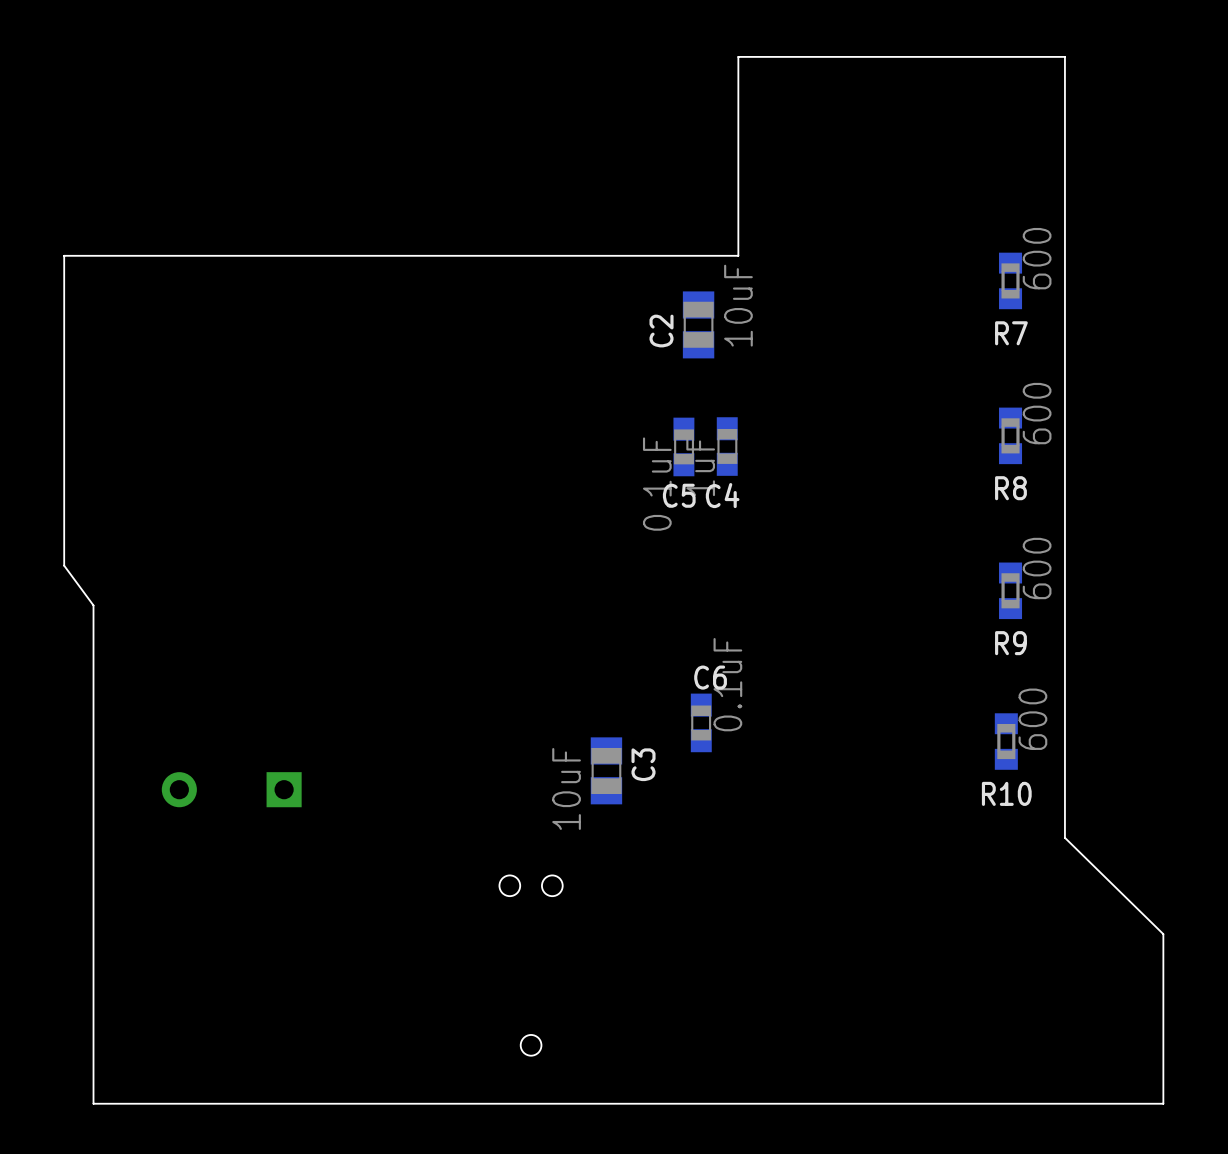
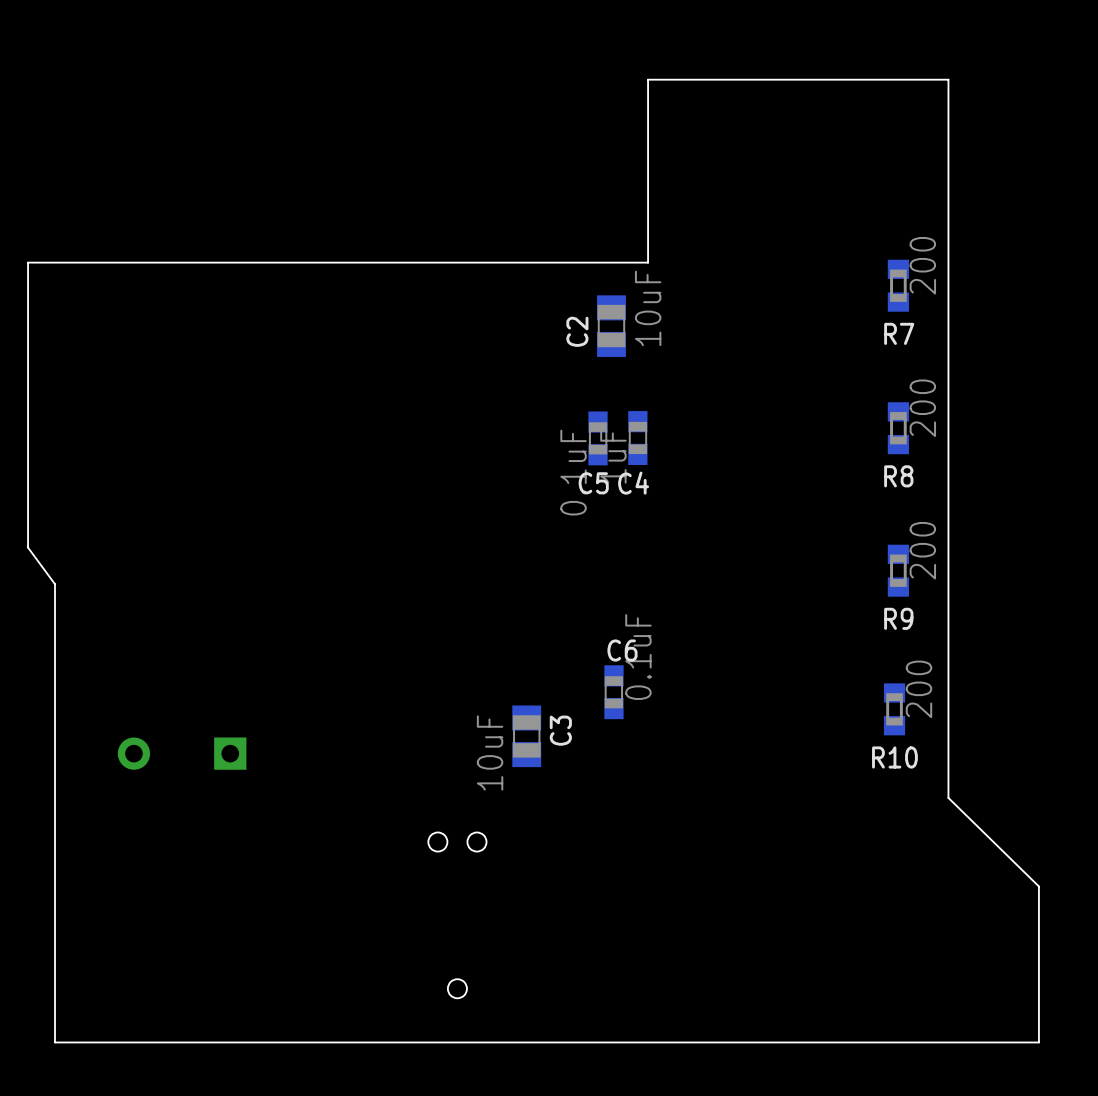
R7 value: 600 (1037, 258) -> 200 (922, 265)
R8 value: 600 (1037, 413) -> 200 (922, 408)
R9 value: 600 (1037, 568) -> 200 (922, 550)
R10 value: 600 (1032, 719) -> 200 (918, 689)

